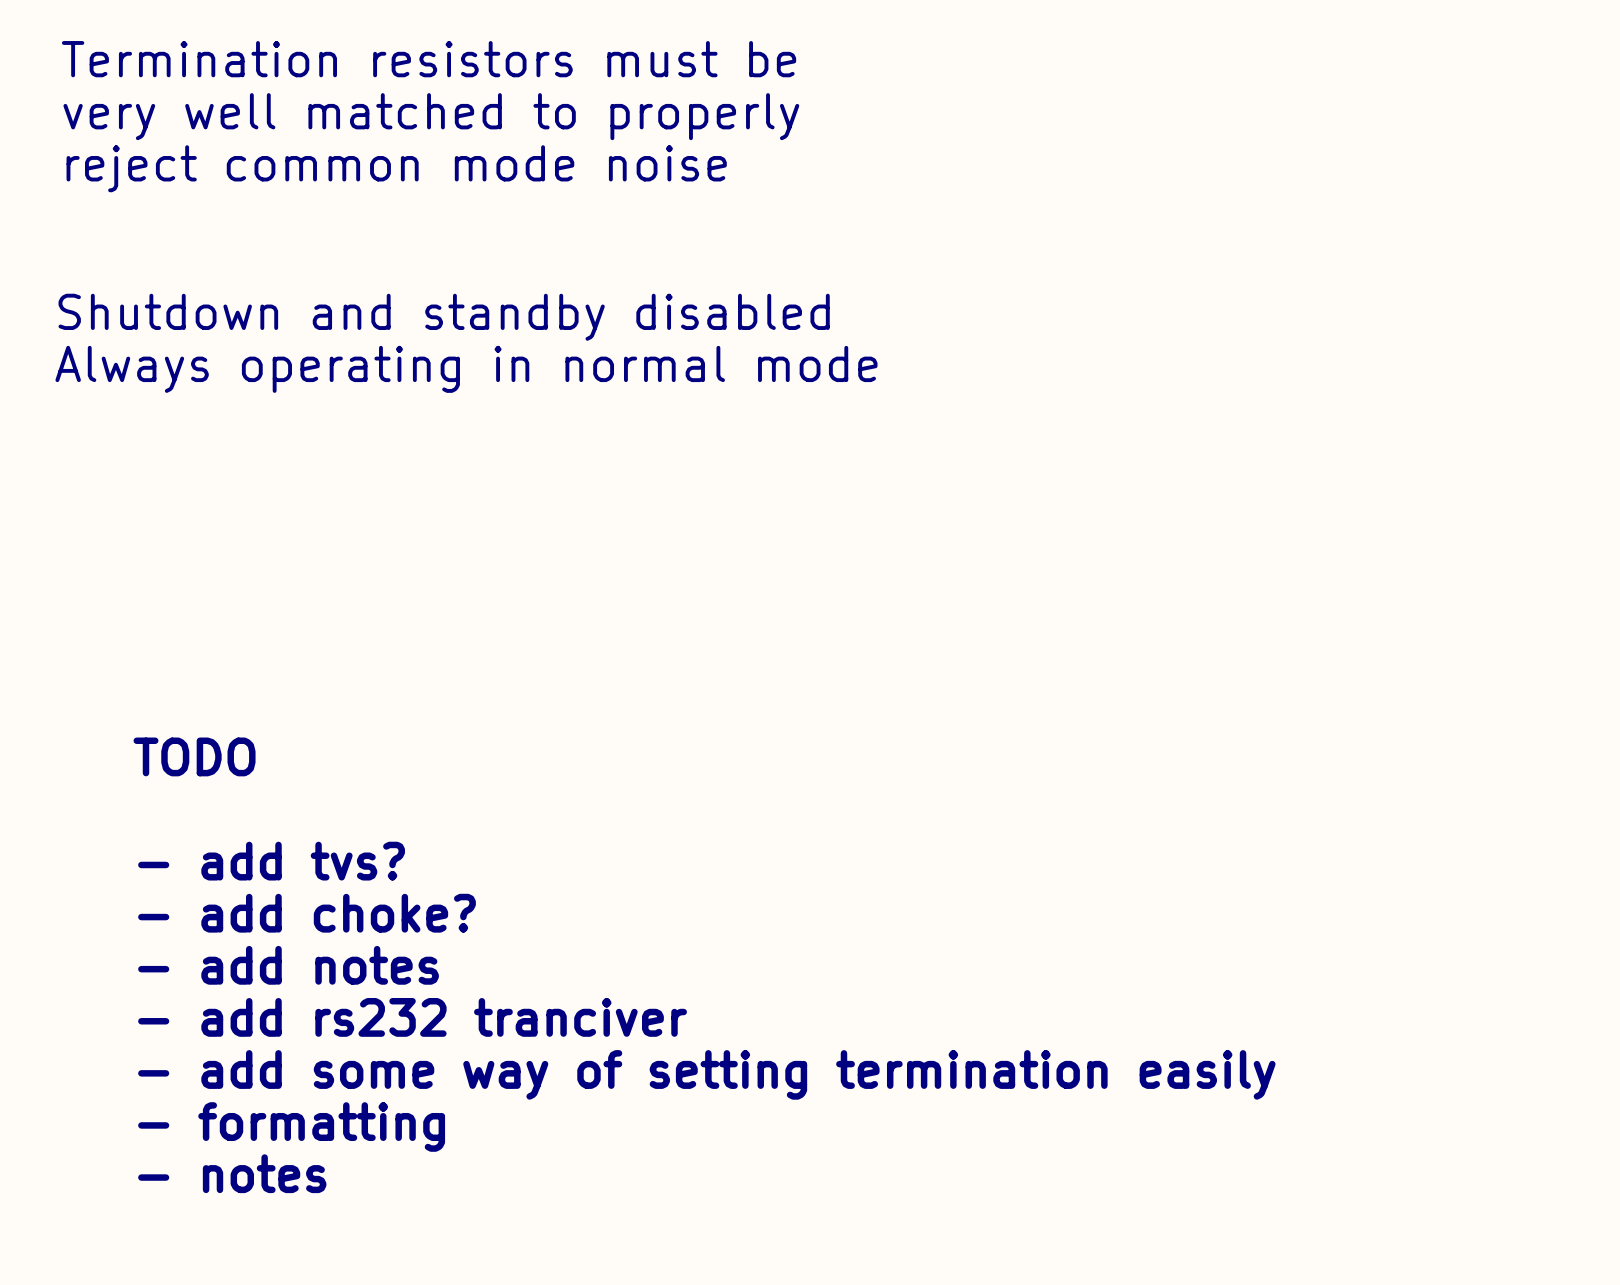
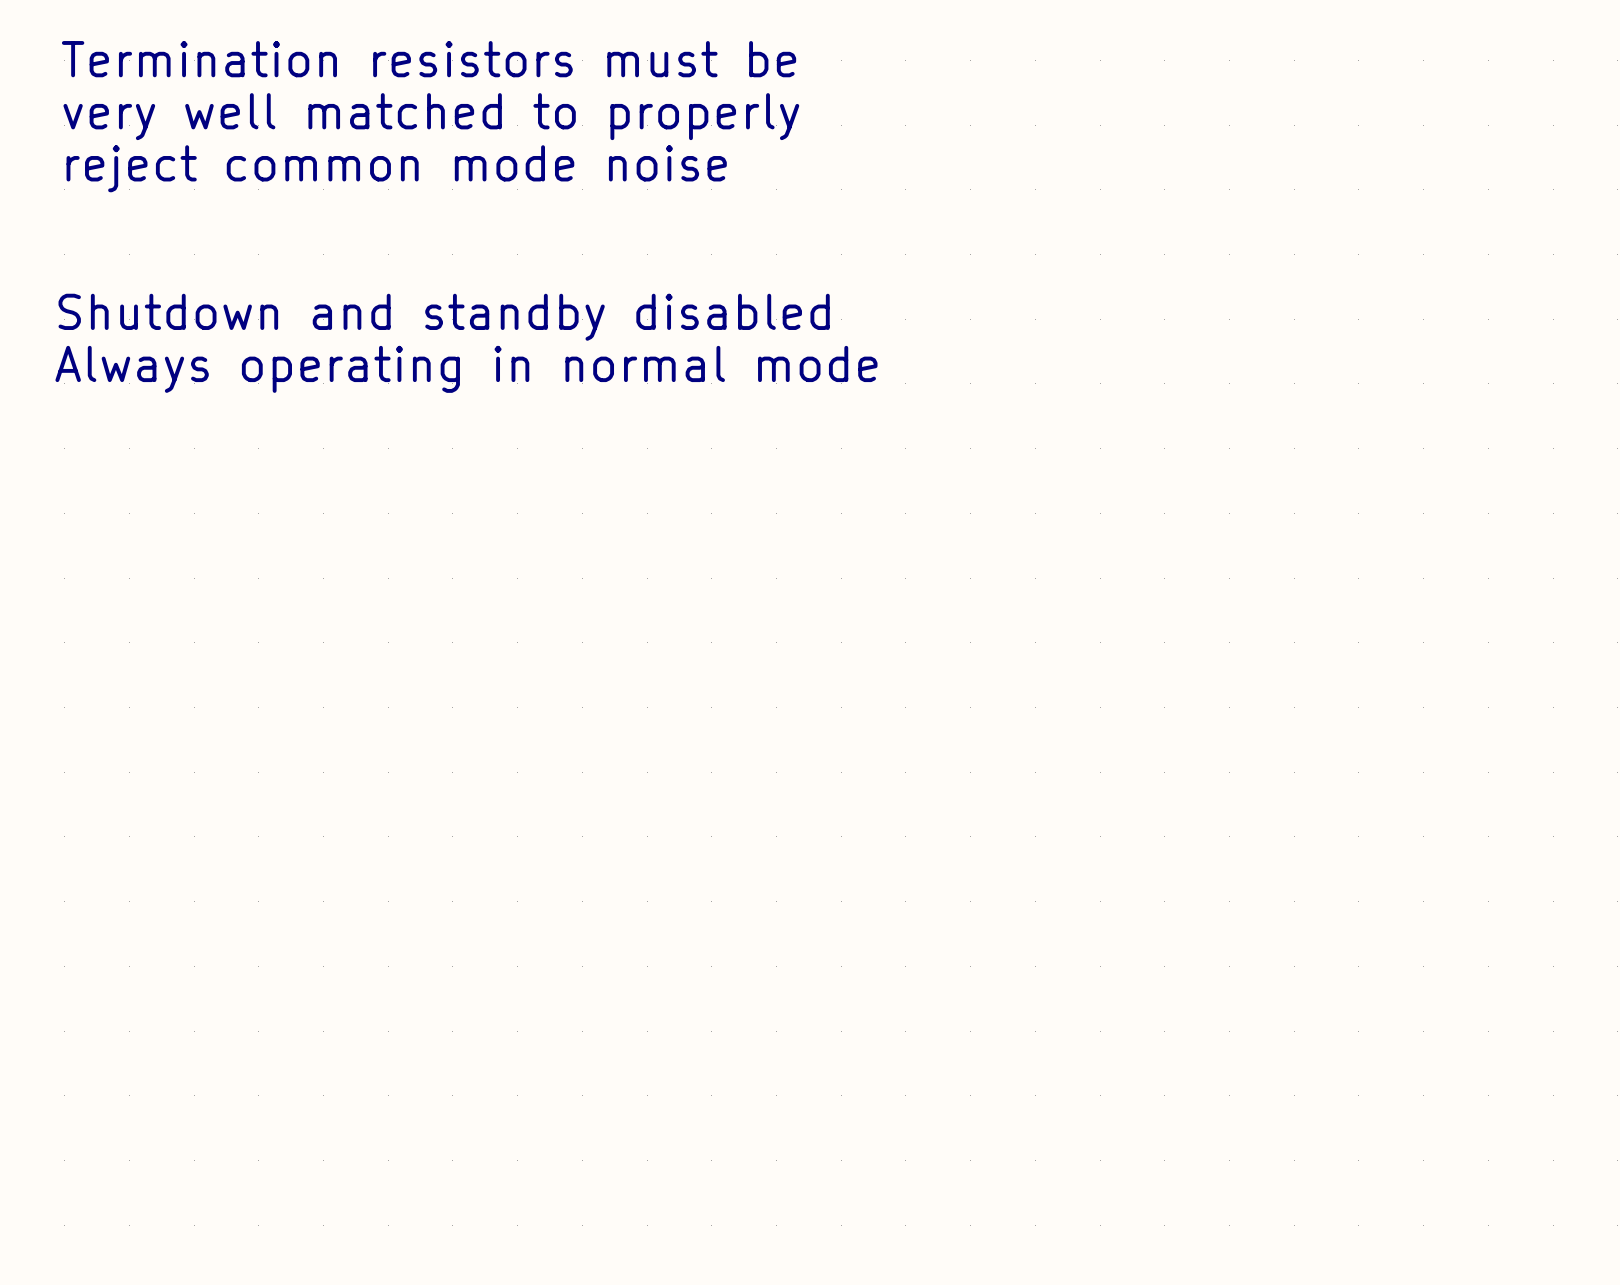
text: TODO (194, 756) -> none
text: - add tvs? (271, 861) -> none
text: - add choke? (307, 913) -> none
text: - add notes (288, 965) -> none
text: - add rs232 tranciver (412, 1017) -> none
text: - add some way of setting termination easily (706, 1074) -> none
text: - formatting (291, 1126) -> none
text: - notes (232, 1173) -> none

